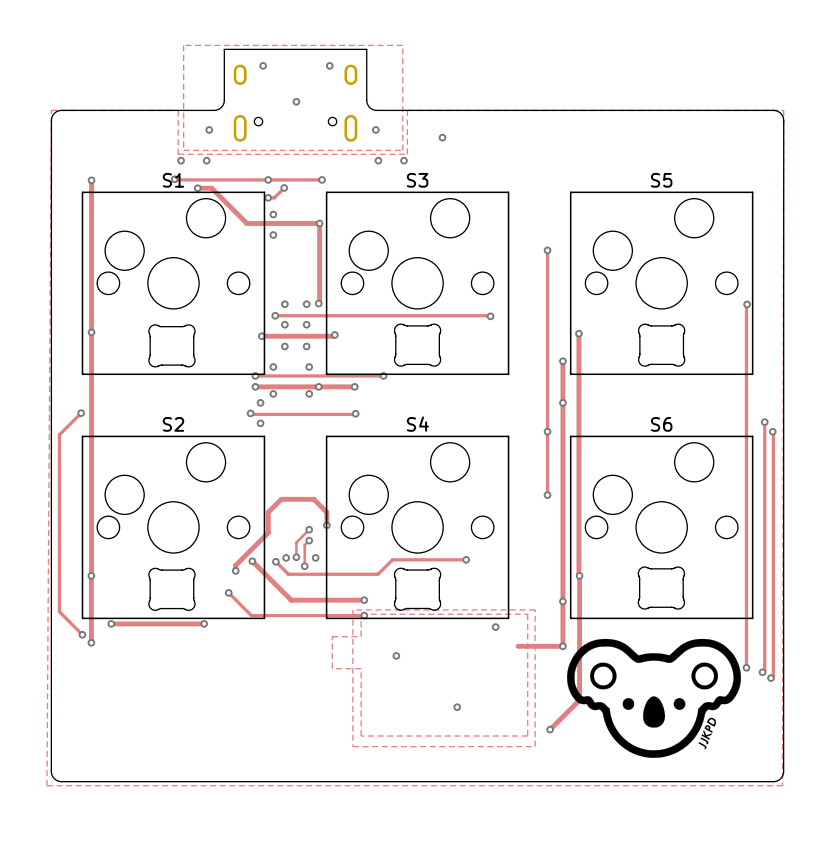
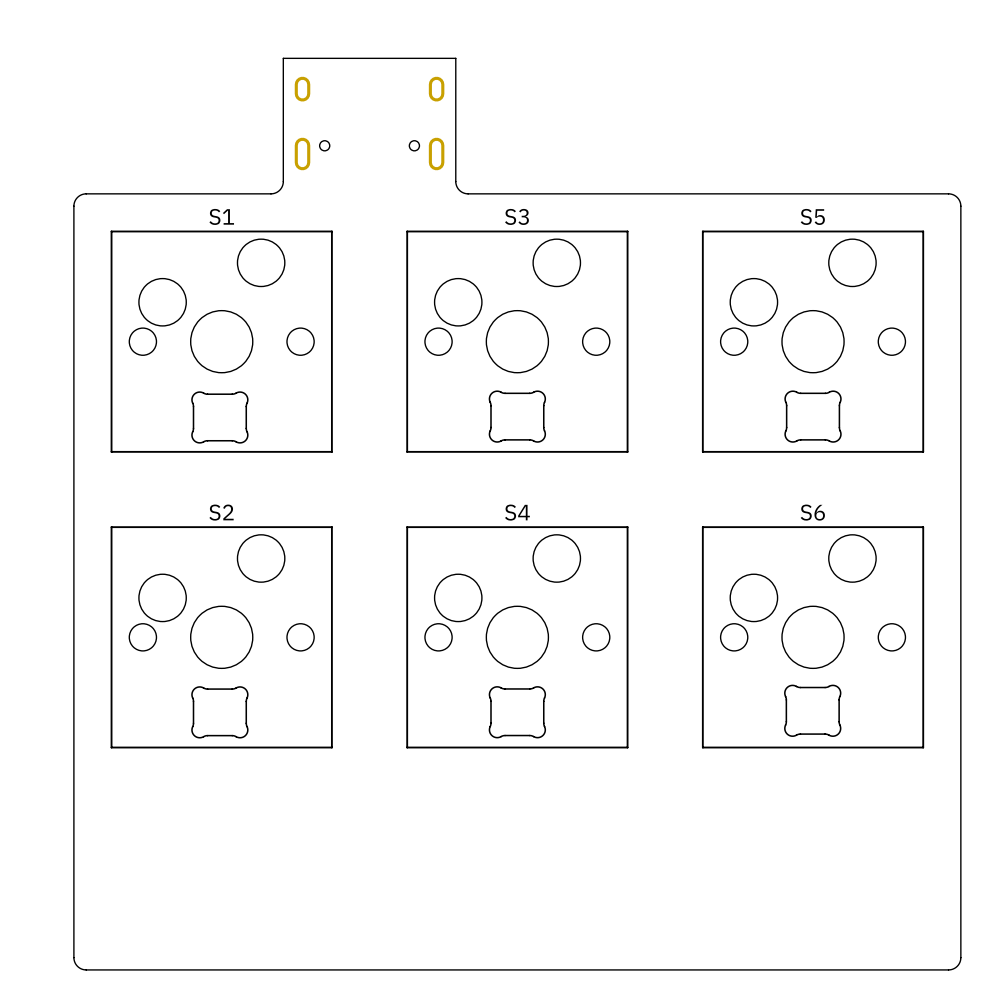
zone outline: (183, 45) (183, 150) (402, 150) (402, 45) (183, 45) -> none
via: (263, 65) -> none
via: (329, 65) -> none
board edge: (224, 100) (222, 106) (215, 110) (61, 110) (55, 112) (51, 117) (51, 771) (53, 777) (61, 781) (778, 780) (783, 771) (782, 115) (773, 110) (376, 110) (369, 107) (366, 100) -> (283, 119) (283, 183) (280, 189) (275, 192) (86, 193) (78, 196) (74, 202) (73, 957) (76, 965) (86, 969) (948, 969) (954, 968) (959, 963) (960, 957) (960, 206) (959, 200) (954, 195) (948, 193) (466, 193) (459, 190) (455, 183) (455, 119)
via: (296, 101) -> none
zone outline: (51, 110) (178, 110) (178, 154) (407, 154) (407, 110) (783, 110) (782, 785) (46, 785) (51, 110) -> none
via: (209, 129) -> none
via: (375, 129) -> none
via: (442, 137) -> none
via: (181, 160) -> none
via: (206, 160) -> none
via: (378, 160) -> none
via: (404, 160) -> none
track: (174, 179) (322, 179) -> none
via: (174, 179) -> none
via: (268, 179) -> none
via: (322, 179) -> none
track: (91, 180) (91, 575) -> none
via: (91, 180) -> none
track: (284, 187) (274, 197) (268, 197) -> none
via: (284, 187) -> none
track: (197, 188) (211, 188) (246, 223) (319, 223) (318, 303) -> none
via: (197, 188) -> none
via: (268, 197) -> none
via: (273, 214) -> none
via: (319, 223) -> none
via: (273, 235) -> none
track: (547, 250) (547, 495) -> none
via: (547, 250) -> none
via: (318, 303) -> none
via: (284, 304) -> none
via: (306, 304) -> none
track: (747, 304) (746, 667) -> none
via: (747, 304) -> none
track: (275, 315) (490, 316) -> none
via: (275, 315) -> none
via: (490, 316) -> none
via: (284, 324) -> none
via: (306, 324) -> none
via: (91, 332) -> none
track: (578, 333) (579, 700) (550, 729) -> none
via: (578, 333) -> none
track: (334, 334) (261, 336) -> none
via: (334, 334) -> none
via: (261, 336) -> none
via: (284, 346) -> none
via: (306, 346) -> none
track: (562, 361) (562, 646) (518, 646) -> none
via: (562, 361) -> none
via: (273, 366) -> none
via: (309, 366) -> none
track: (255, 375) (383, 375) -> none
via: (255, 375) -> none
via: (383, 375) -> none
track: (255, 386) (354, 386) -> none
via: (255, 386) -> none
via: (318, 386) -> none
via: (354, 386) -> none
via: (273, 393) -> none
via: (309, 393) -> none
via: (260, 402) -> none
via: (562, 402) -> none
track: (81, 413) (59, 434) (59, 611) (82, 634) -> none
via: (81, 413) -> none
track: (250, 413) (355, 413) -> none
via: (250, 413) -> none
via: (355, 413) -> none
track: (764, 422) (764, 670) (762, 672) -> none
via: (764, 422) -> none
via: (260, 423) -> none
via: (547, 431) -> none
track: (772, 431) (773, 675) (770, 678) -> none
via: (772, 431) -> none
via: (547, 495) -> none
track: (326, 525) (326, 512) (313, 499) (281, 499) (268, 512) (268, 532) (235, 565) (235, 570) -> none
via: (326, 525) -> none
track: (309, 529) (296, 542) (296, 557) -> none
via: (309, 529) -> none
track: (309, 540) (304, 545) (304, 566) -> none
via: (309, 540) -> none
via: (286, 557) -> none
via: (296, 557) -> none
via: (315, 557) -> none
track: (466, 559) (392, 559) (378, 574) (288, 574) (275, 561) -> none
via: (466, 559) -> none
track: (252, 561) (291, 600) (364, 600) -> none
via: (252, 561) -> none
via: (275, 561) -> none
via: (304, 566) -> none
via: (235, 570) -> none
track: (91, 575) (91, 642) -> none
via: (91, 575) -> none
via: (579, 575) -> none
track: (228, 592) (251, 615) (364, 615) -> none
via: (228, 592) -> none
via: (364, 600) -> none
via: (562, 601) -> none
zone outline: (352, 609) (352, 746) (535, 746) (535, 609) (352, 609) -> none
zone outline: (361, 614) (361, 636) (332, 636) (332, 668) (361, 668) (361, 736) (527, 736) (527, 614) (361, 614) -> none
via: (364, 615) -> none
track: (111, 623) (204, 623) -> none
via: (111, 623) -> none
via: (204, 623) -> none
via: (495, 627) -> none
via: (82, 634) -> none
drawing: [567, 638, 741, 758] -> none
via: (91, 642) -> none
via: (562, 646) -> none
via: (396, 655) -> none
via: (746, 667) -> none
via: (762, 672) -> none
via: (770, 678) -> none
via: (457, 707) -> none
via: (550, 729) -> none

